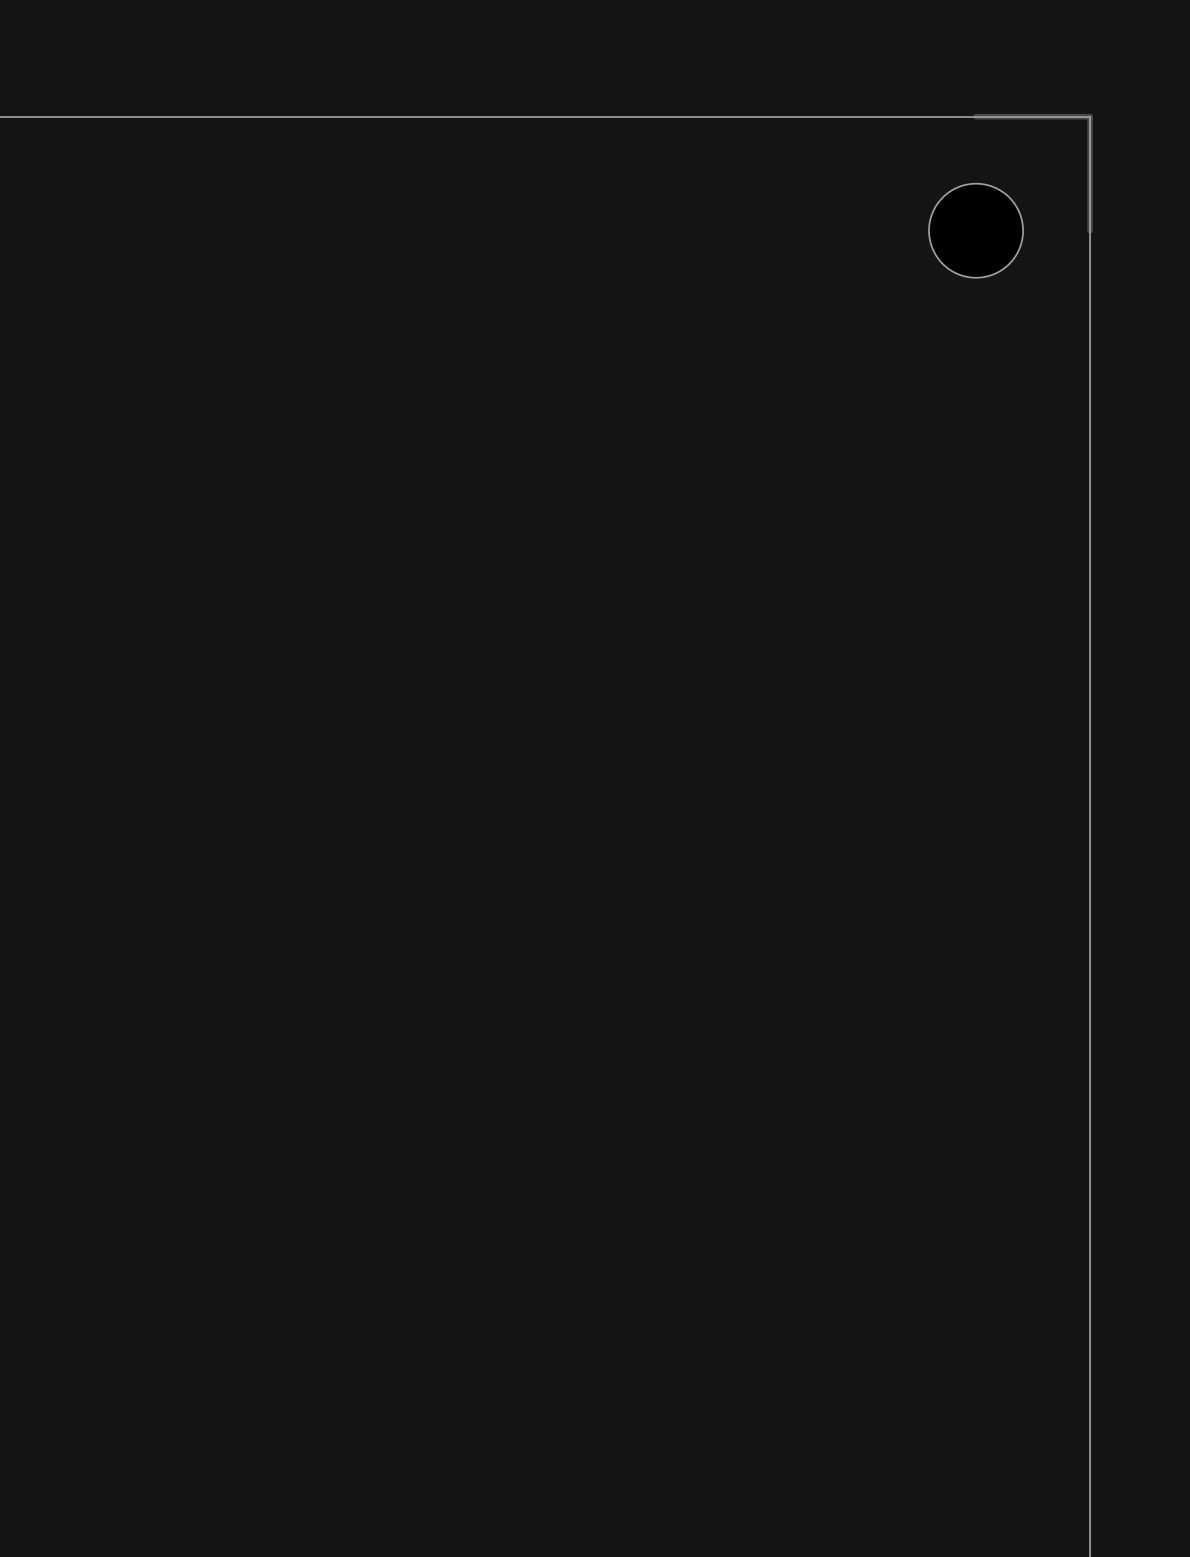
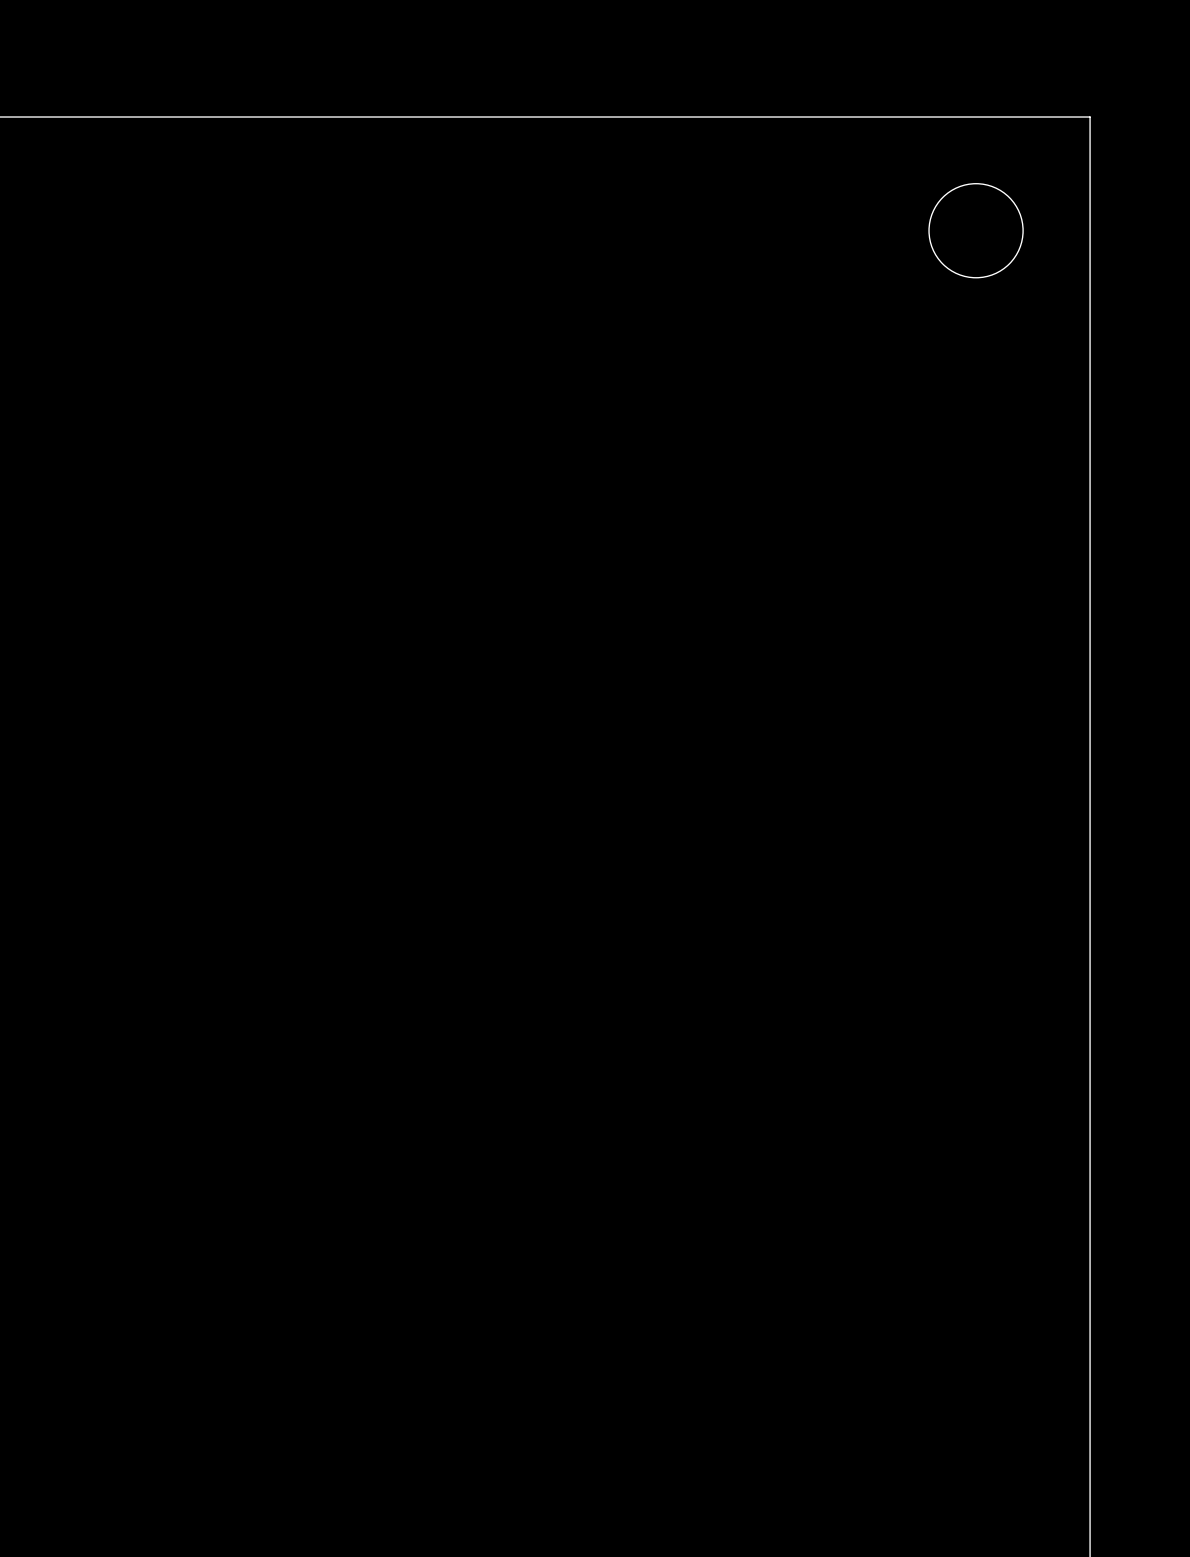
track: (976, 116) (1090, 116) (1090, 230) -> none

